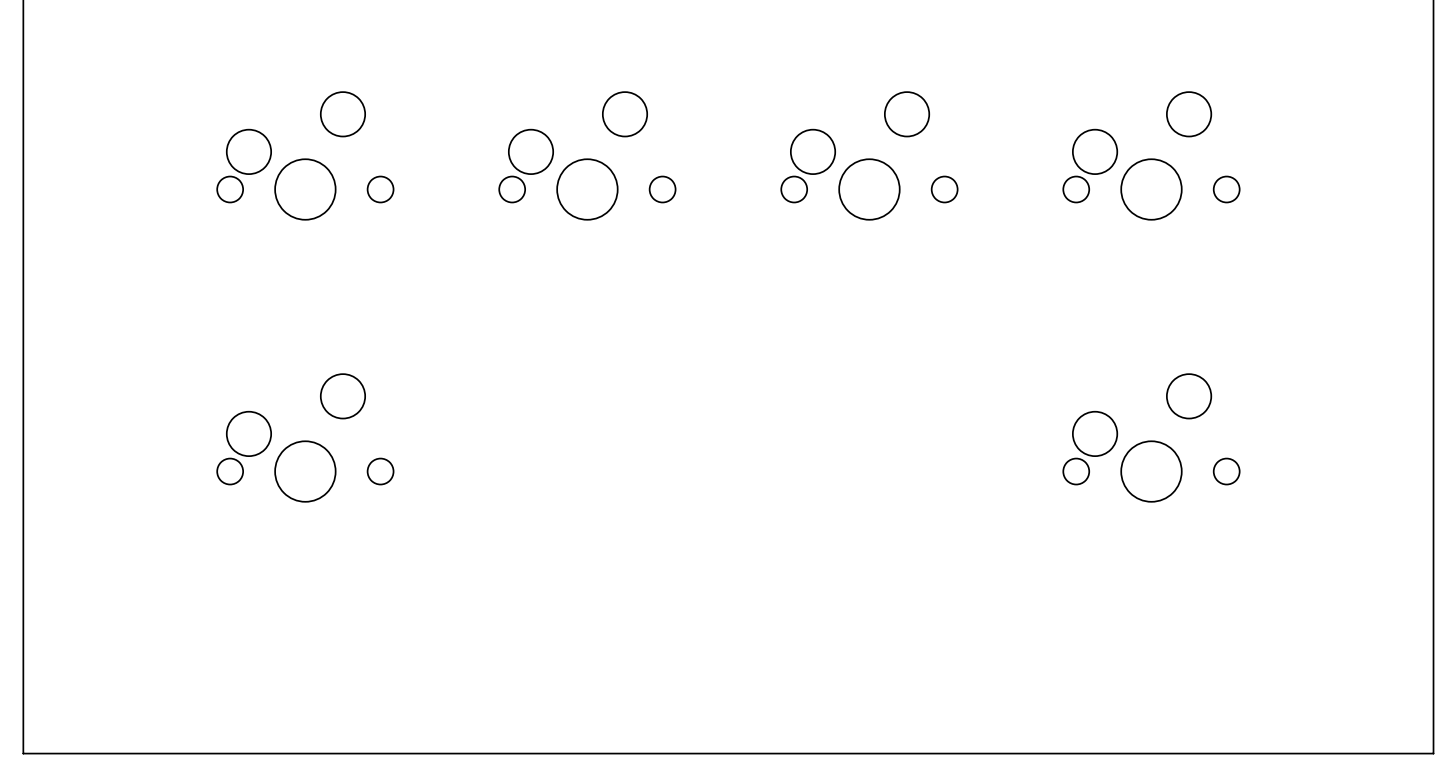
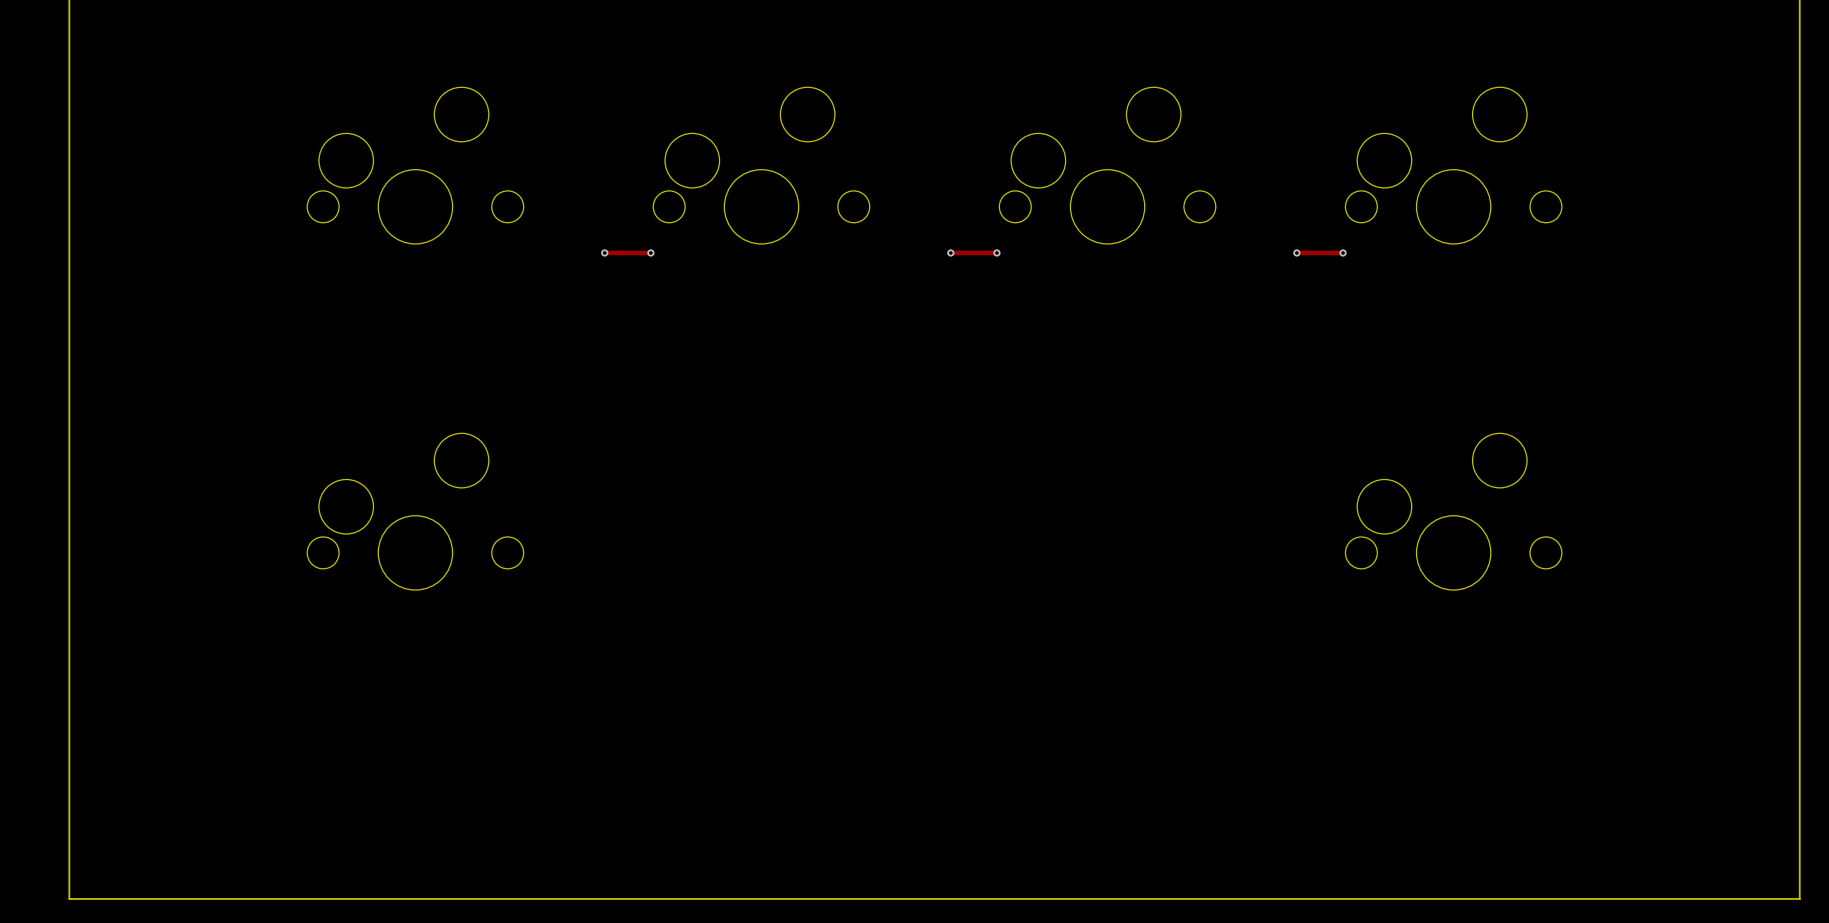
track: none -> (604, 252) (650, 252)
via: none -> (604, 252)
via: none -> (650, 252)
track: none -> (950, 252) (996, 252)
via: none -> (950, 252)
via: none -> (996, 252)
track: none -> (1296, 252) (1343, 252)
via: none -> (1296, 252)
via: none -> (1343, 252)

